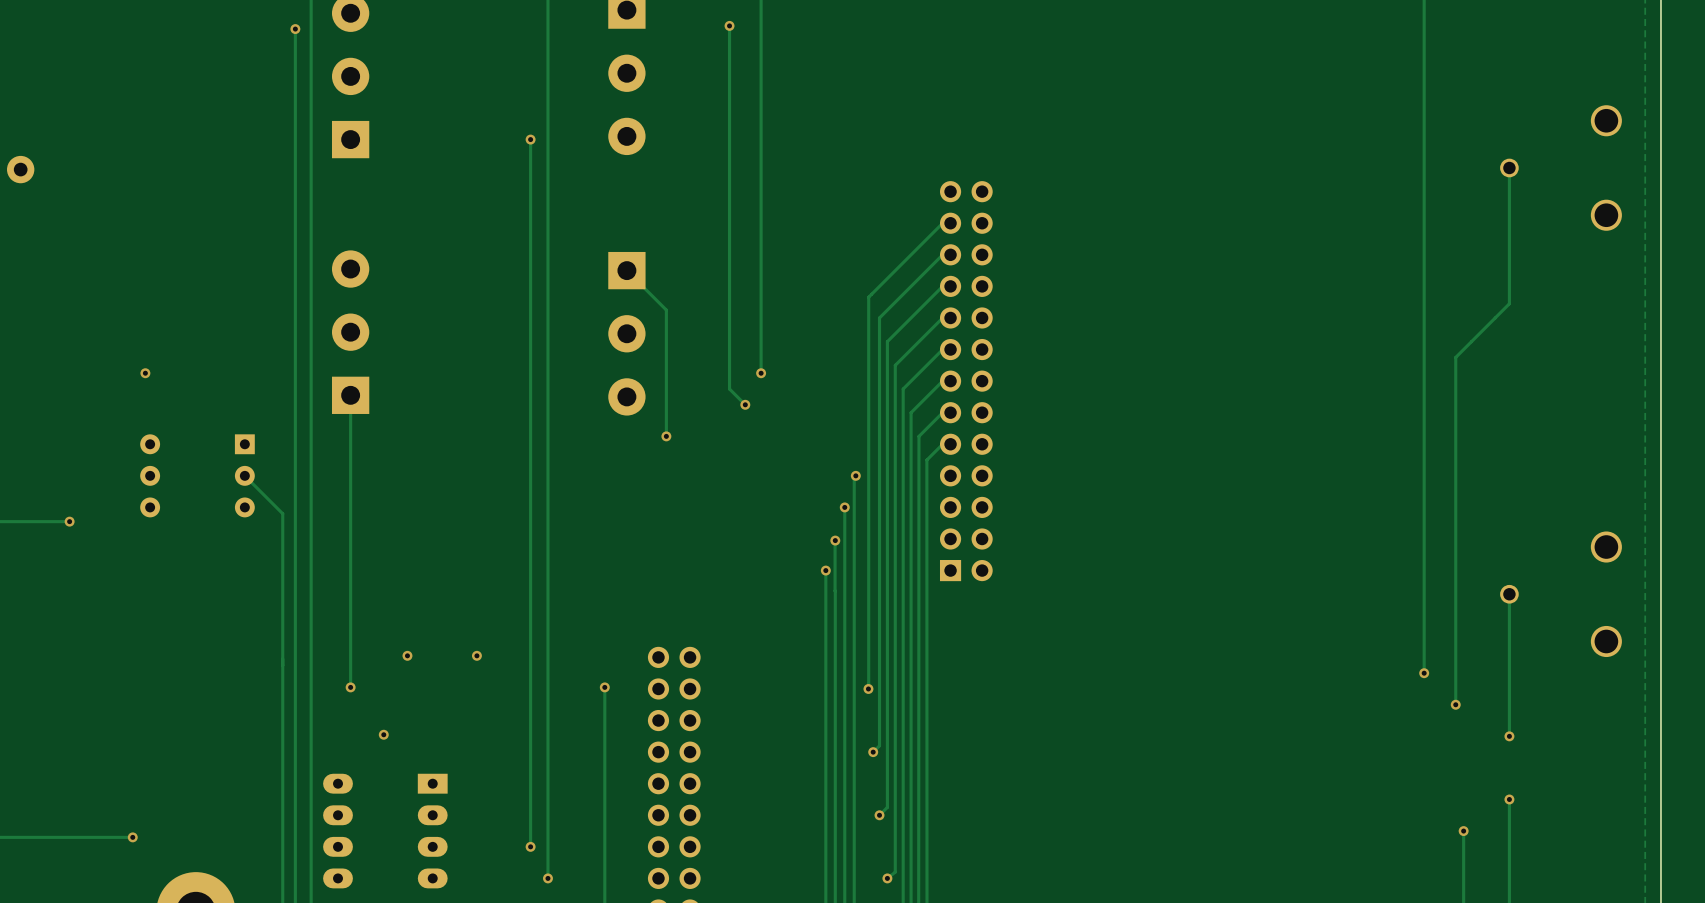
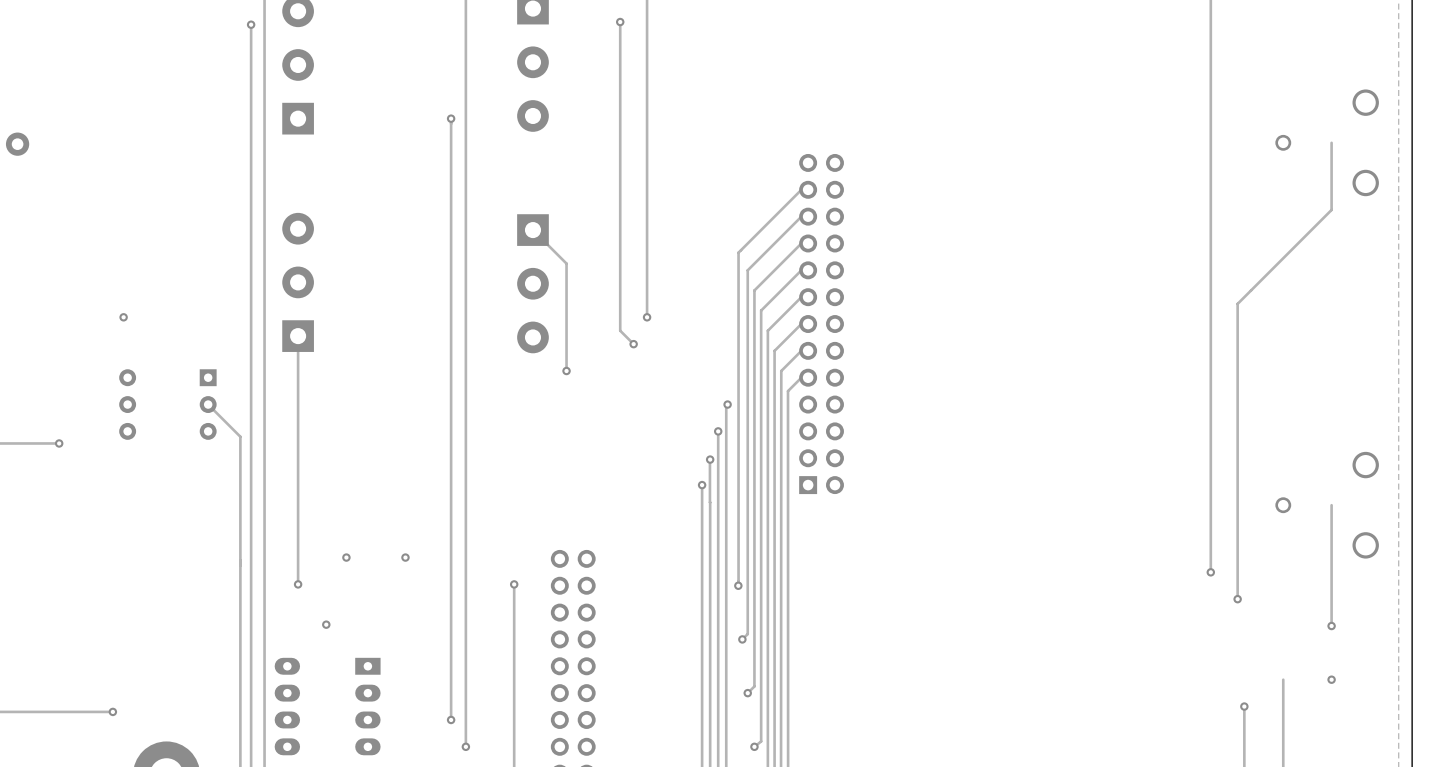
track: (1509, 167) (1509, 303) -> (1331, 142) (1331, 209) (1283, 258)
track: (1509, 594) (1509, 736) -> (1331, 505) (1331, 626)
via: (1509, 736) -> none
via: none -> (1331, 626)
via: (1509, 799) -> none
via: none -> (1331, 679)

